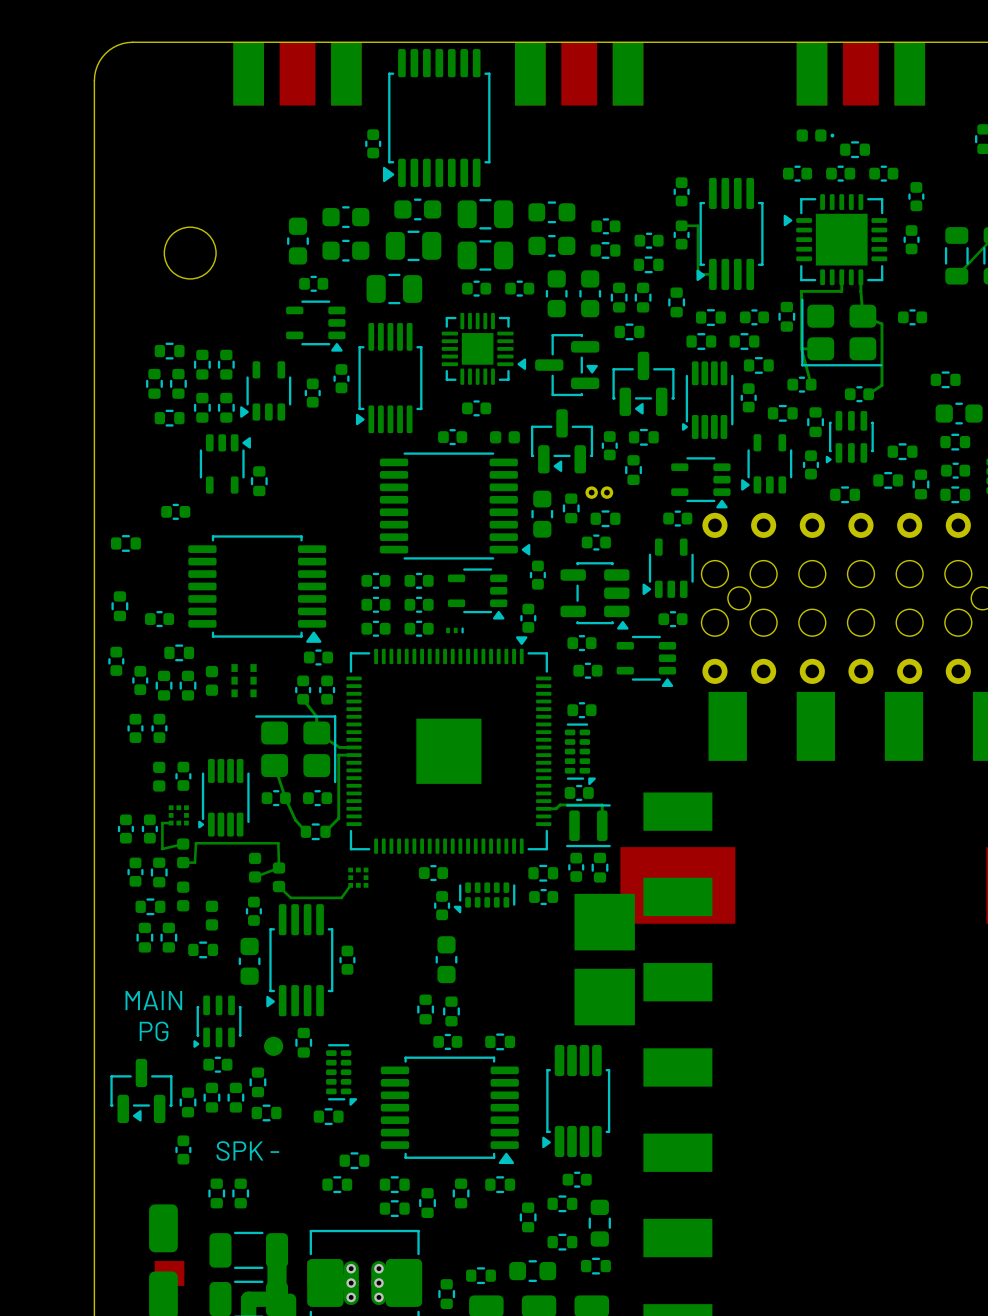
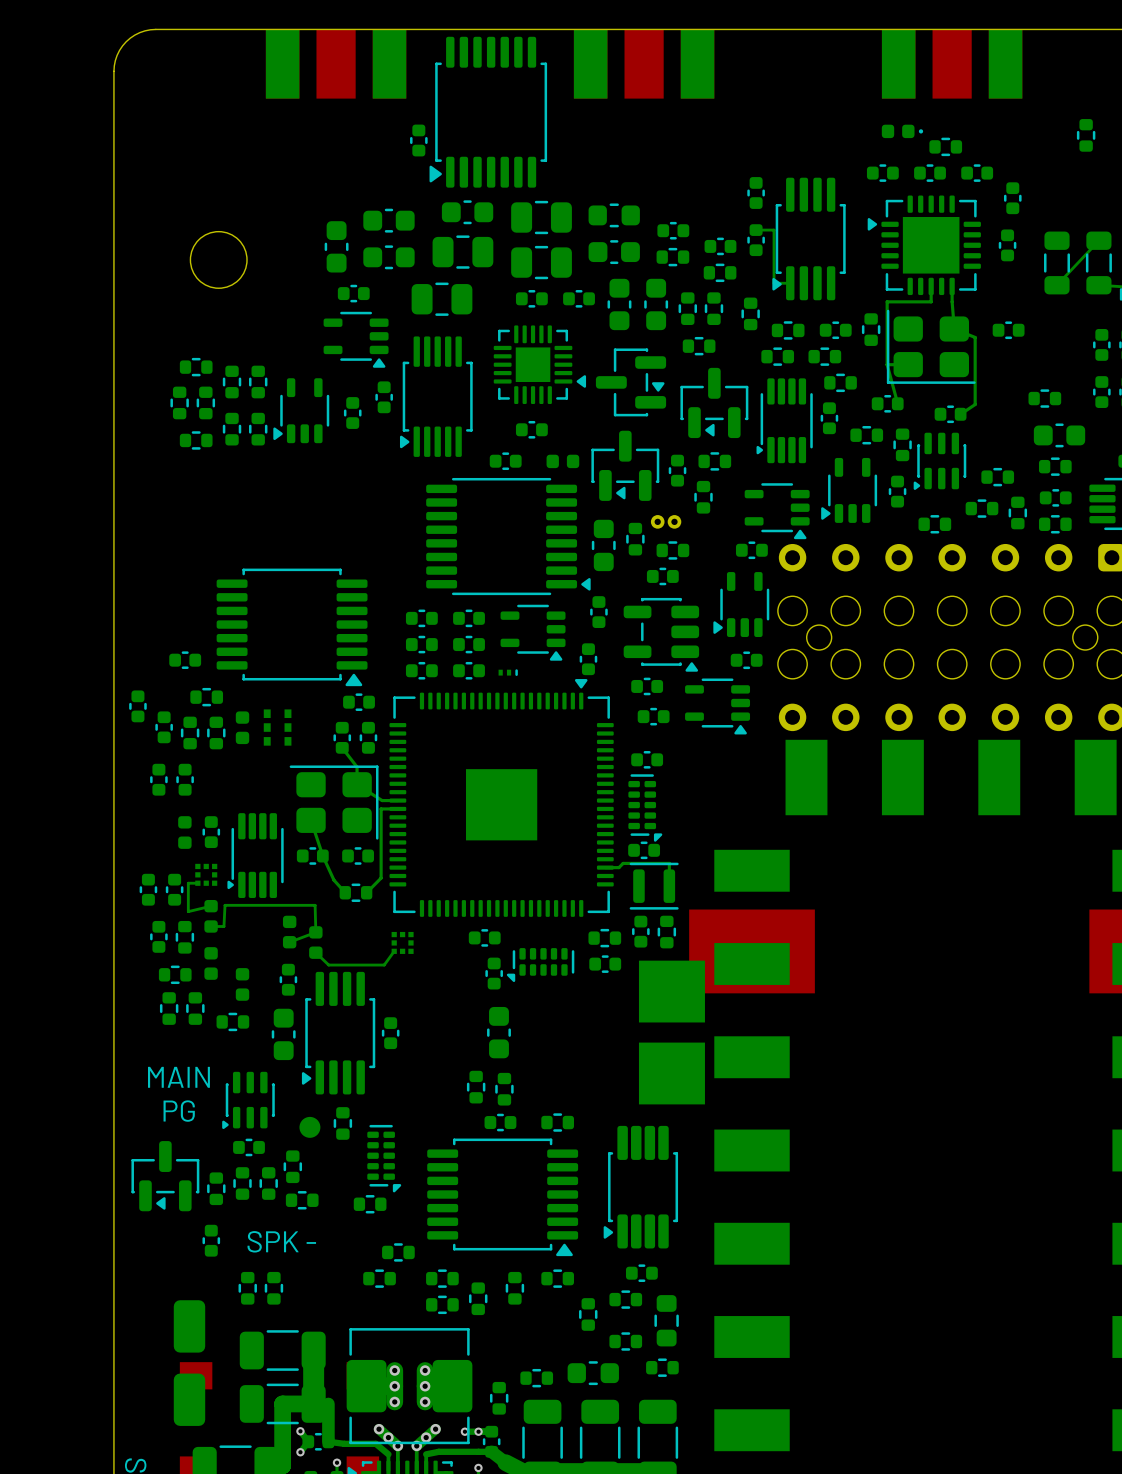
part: (225, 463) -> none
part: (259, 481) -> none
part: (175, 511) -> none
part: (125, 543) -> none
part: (119, 606) -> none

